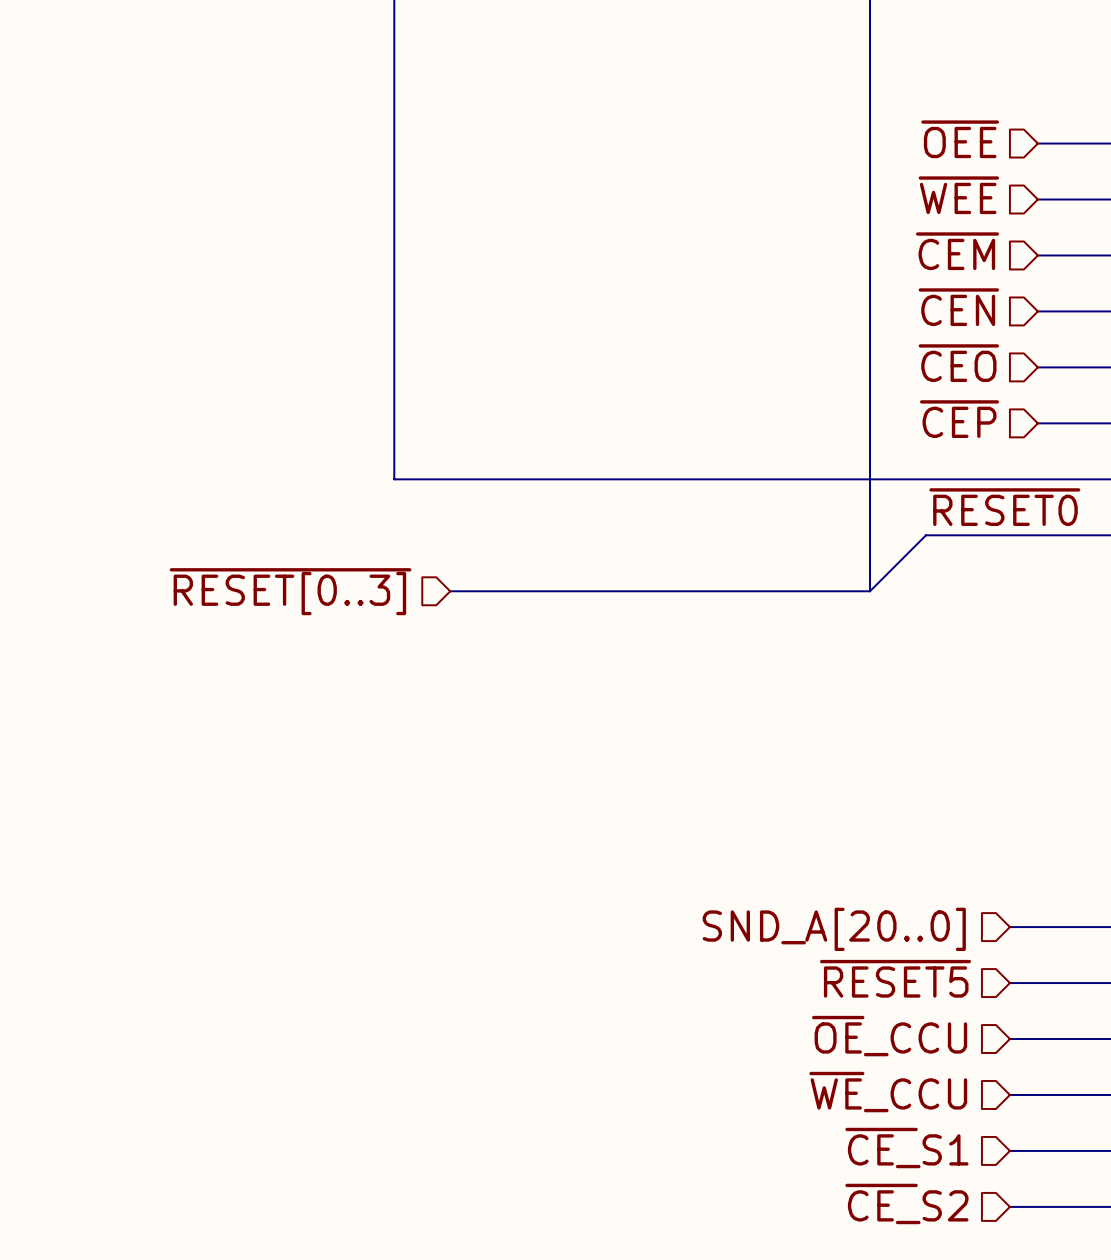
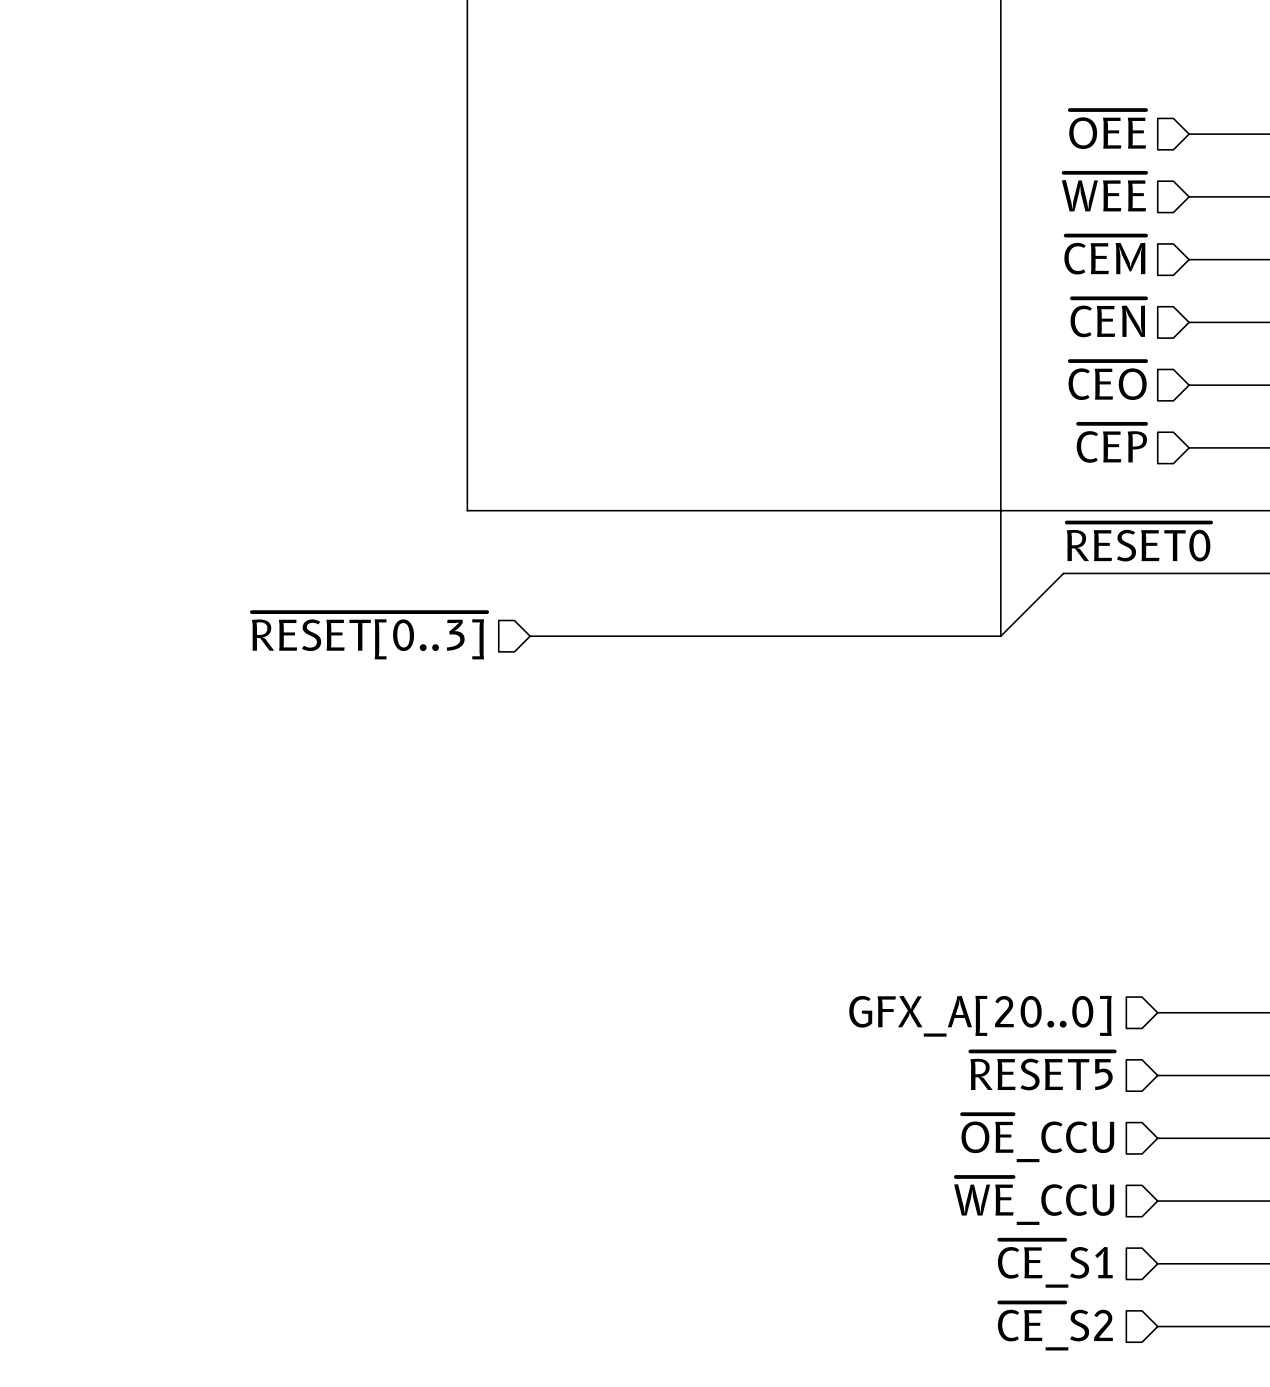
hierarchical label: SND_A[20..0] (834, 929) -> GFX_A[20..0] (980, 1016)

